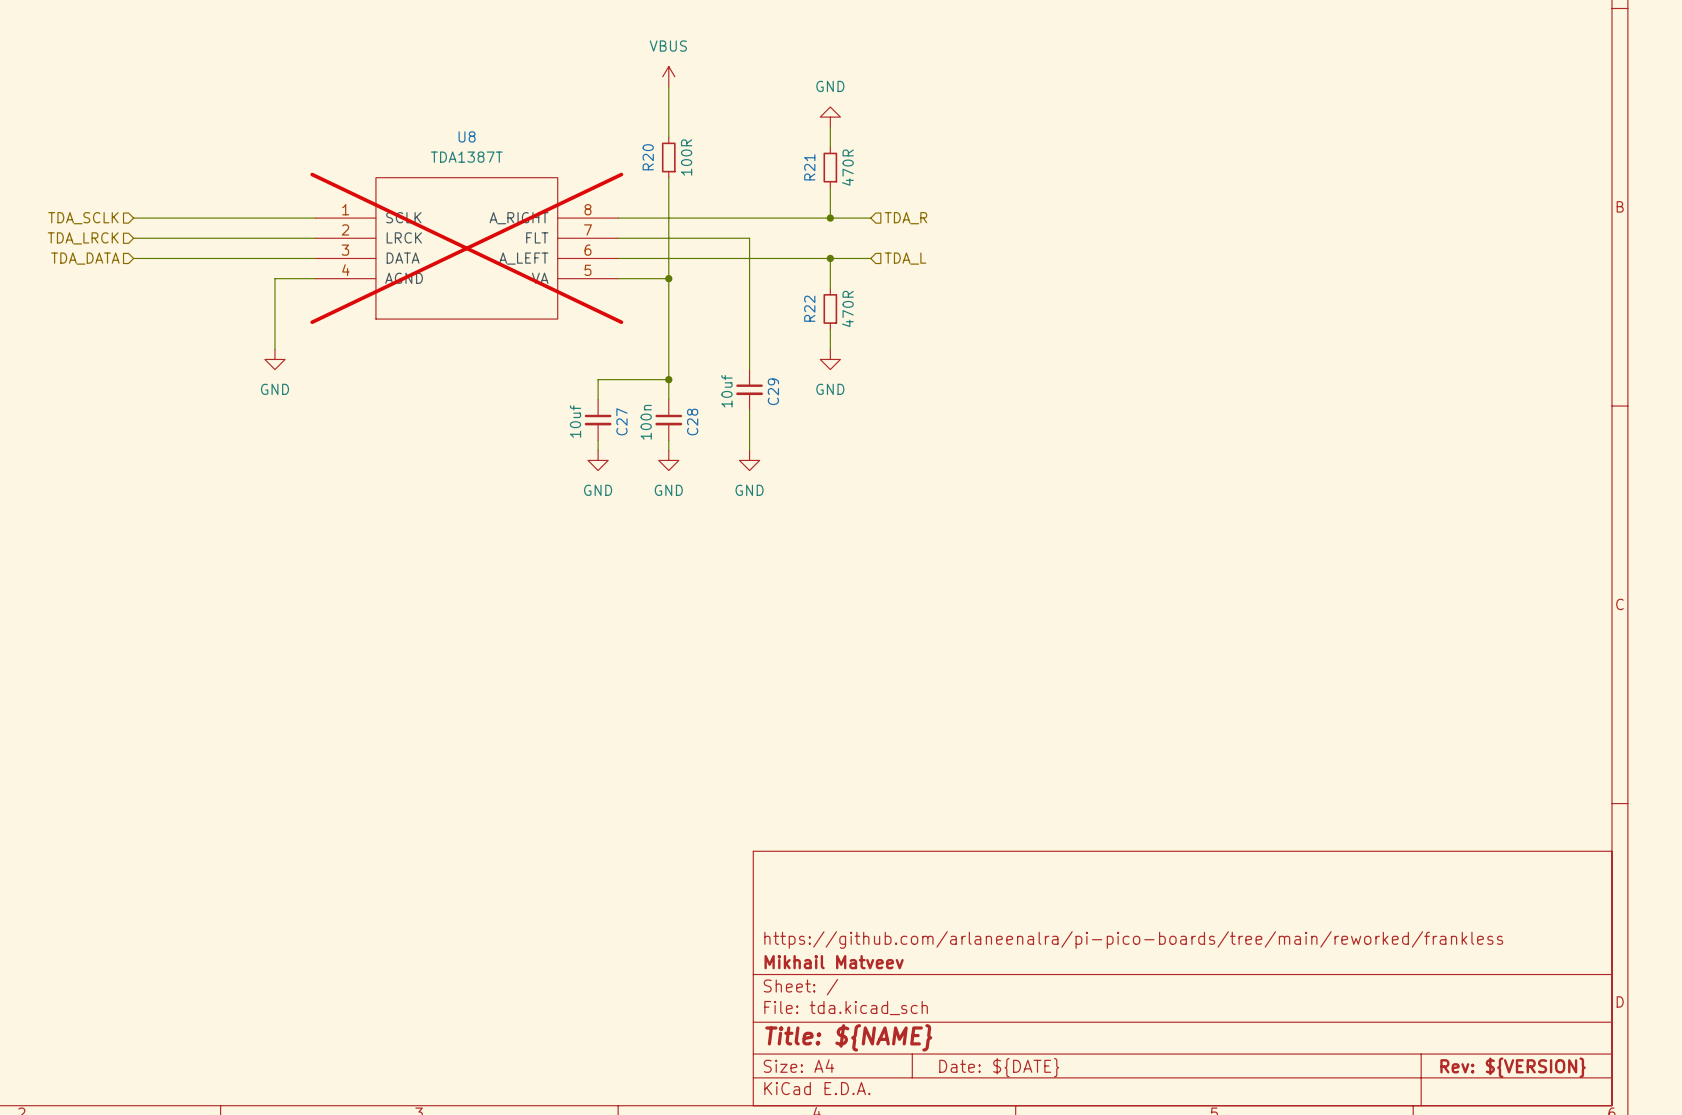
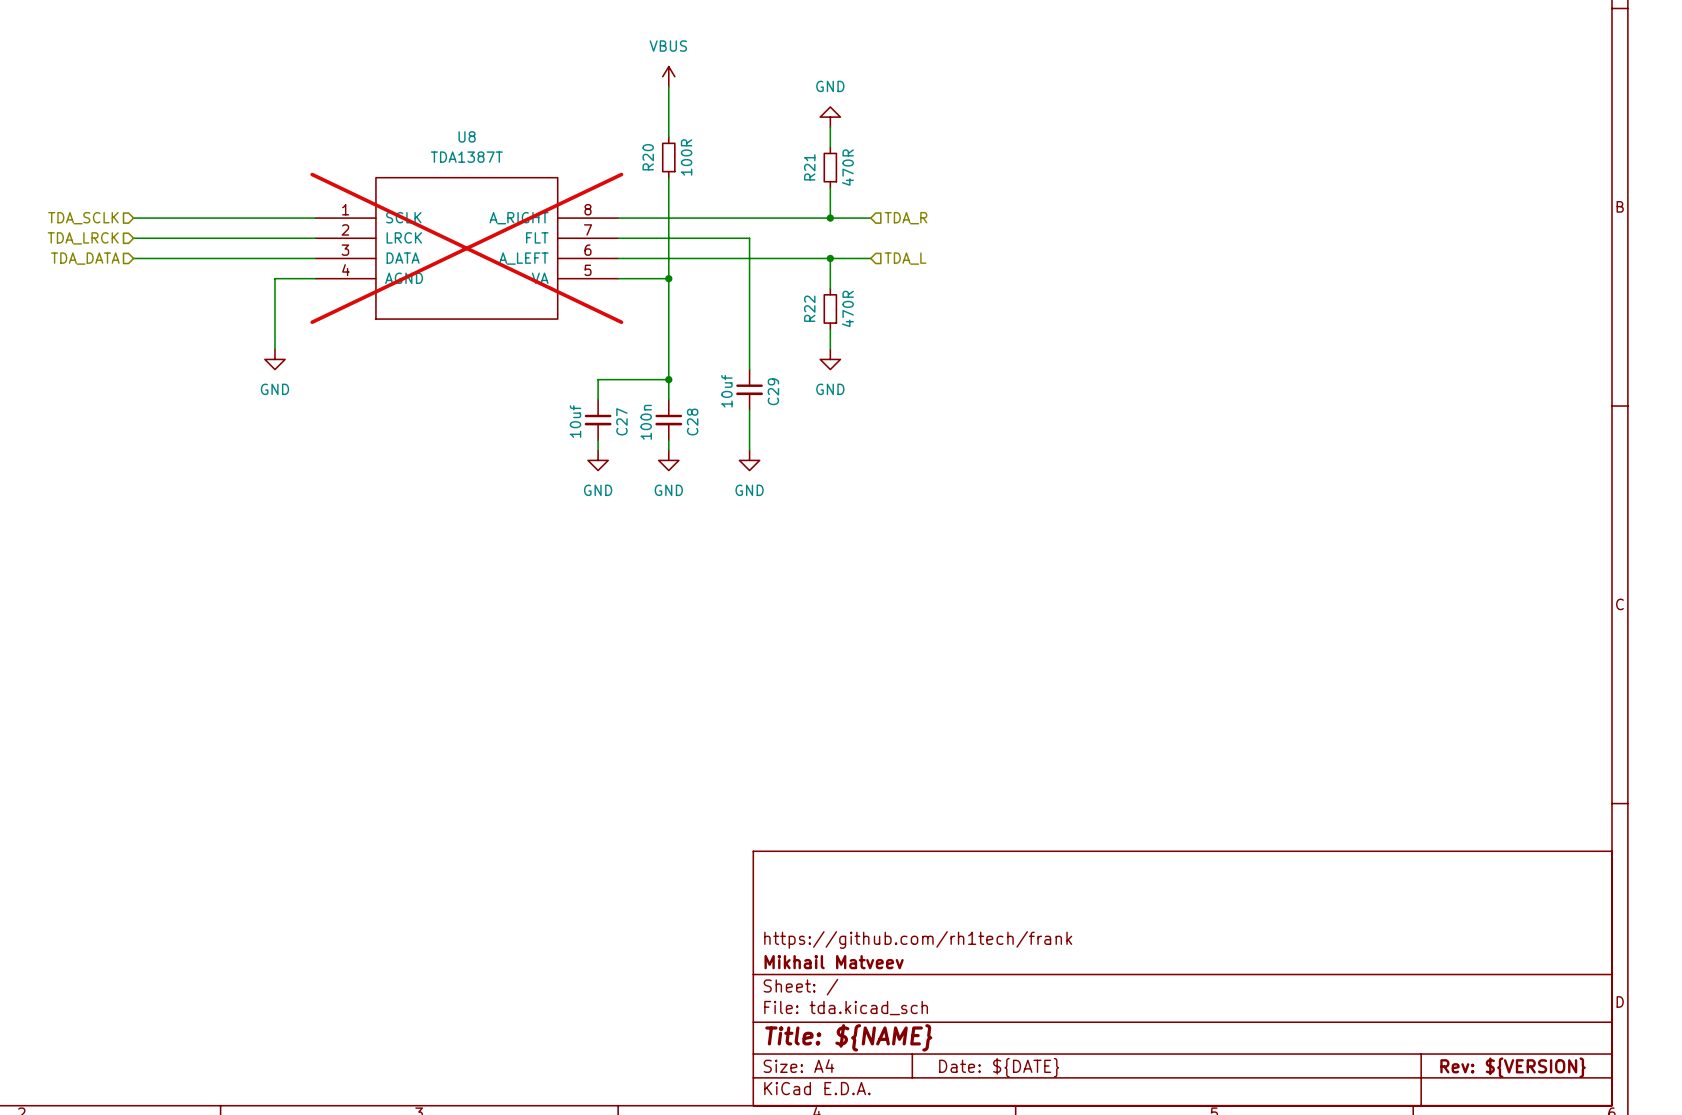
title block: https://github.com/arlaneenalra/pi-pico-boards/tree/main/reworked/frankless (1133, 940) -> https://github.com/rh1tech/frank (918, 940)

